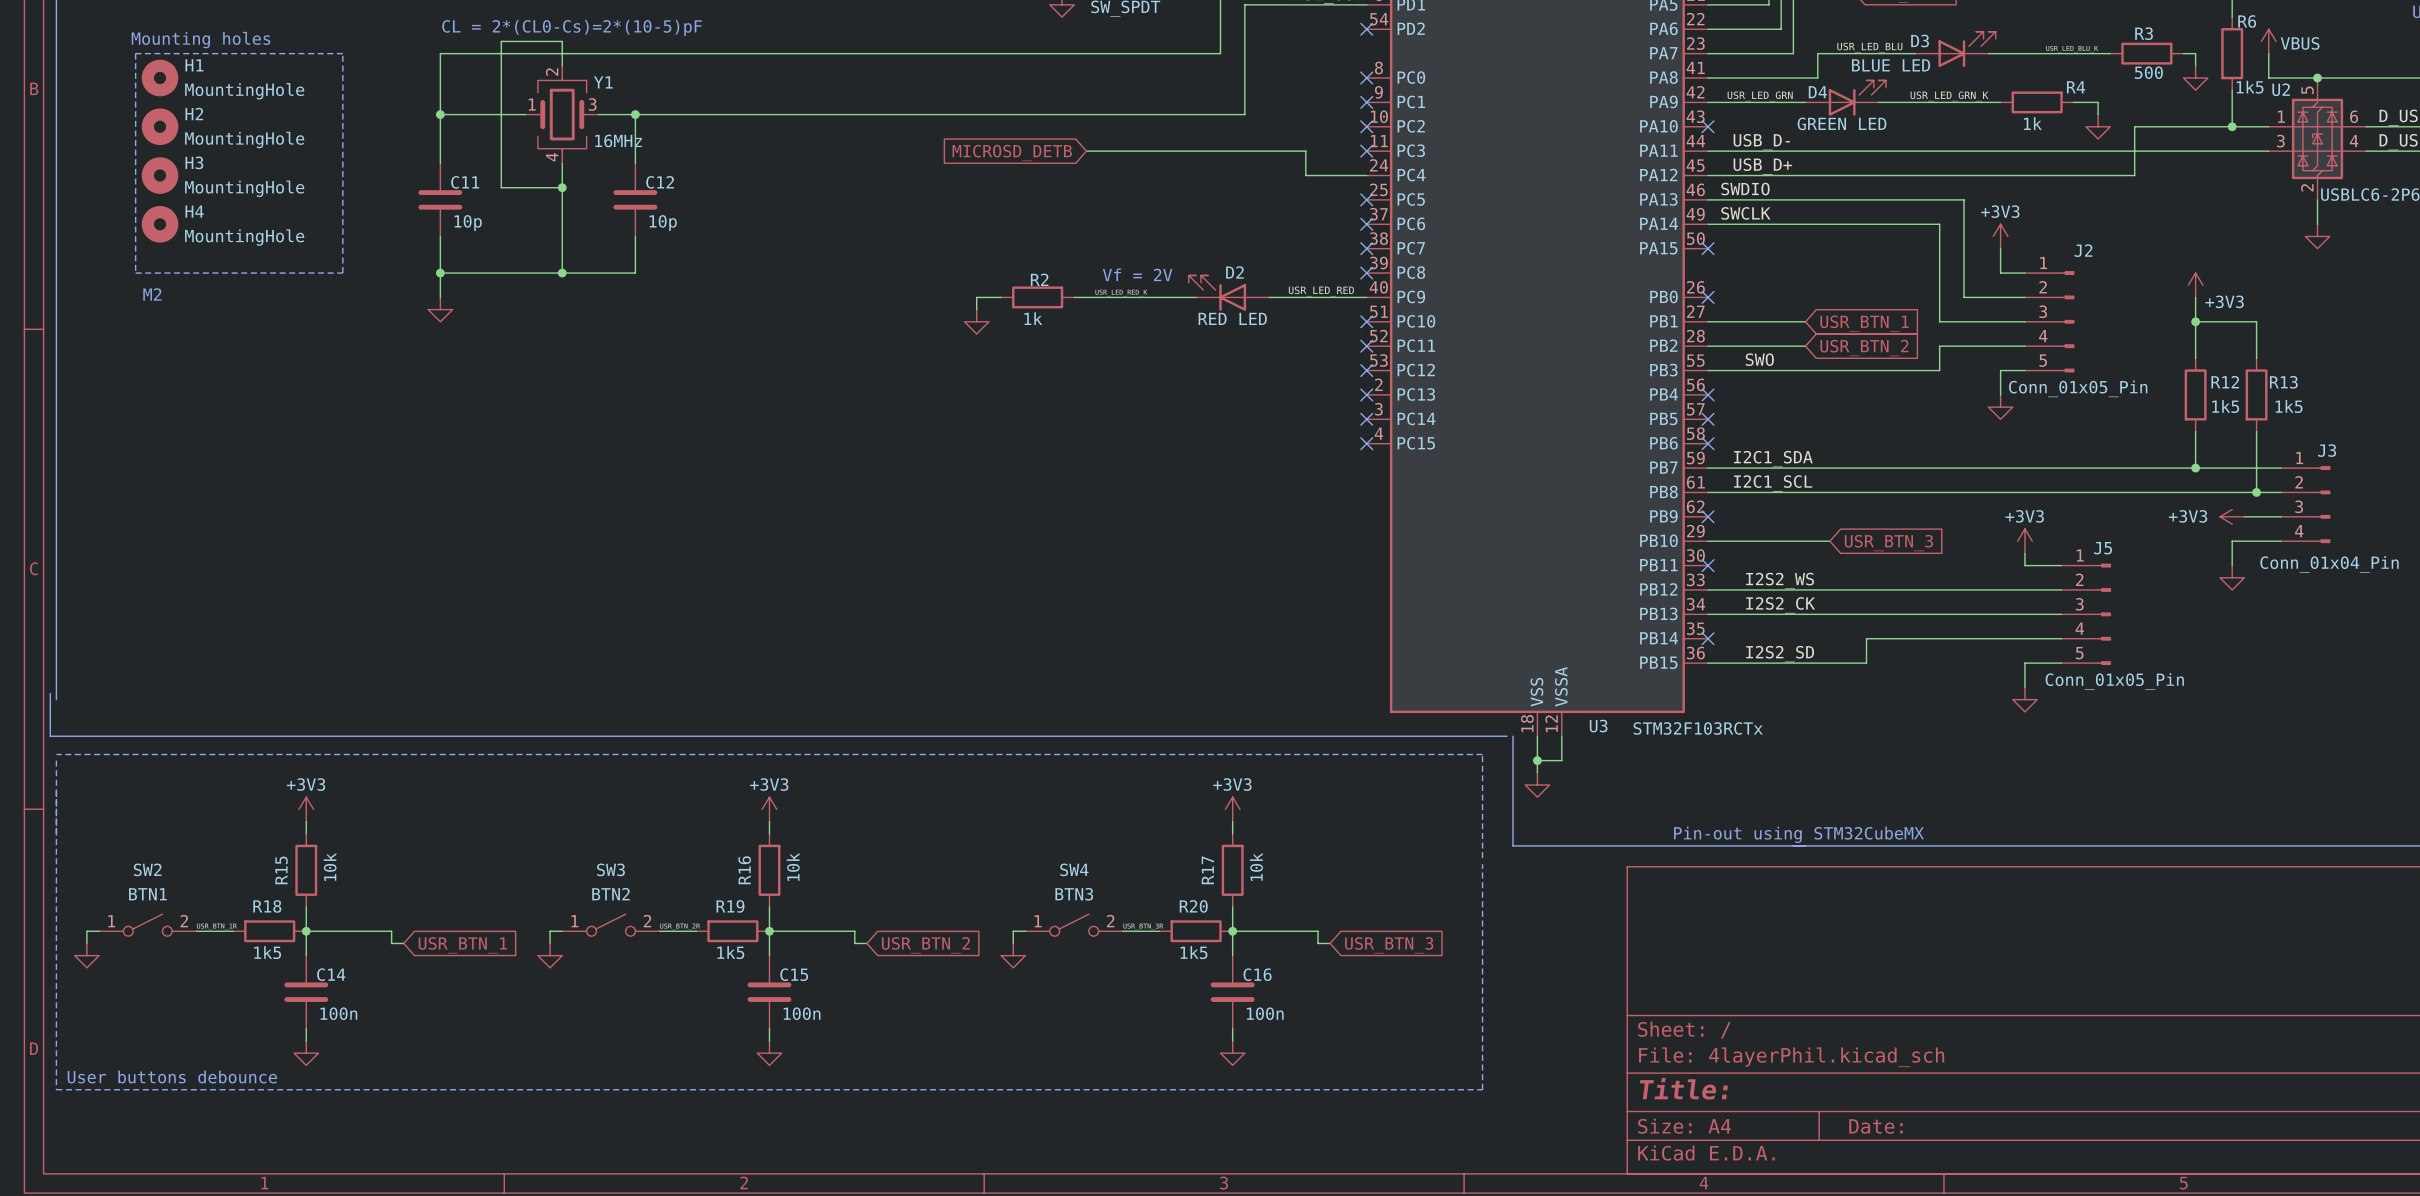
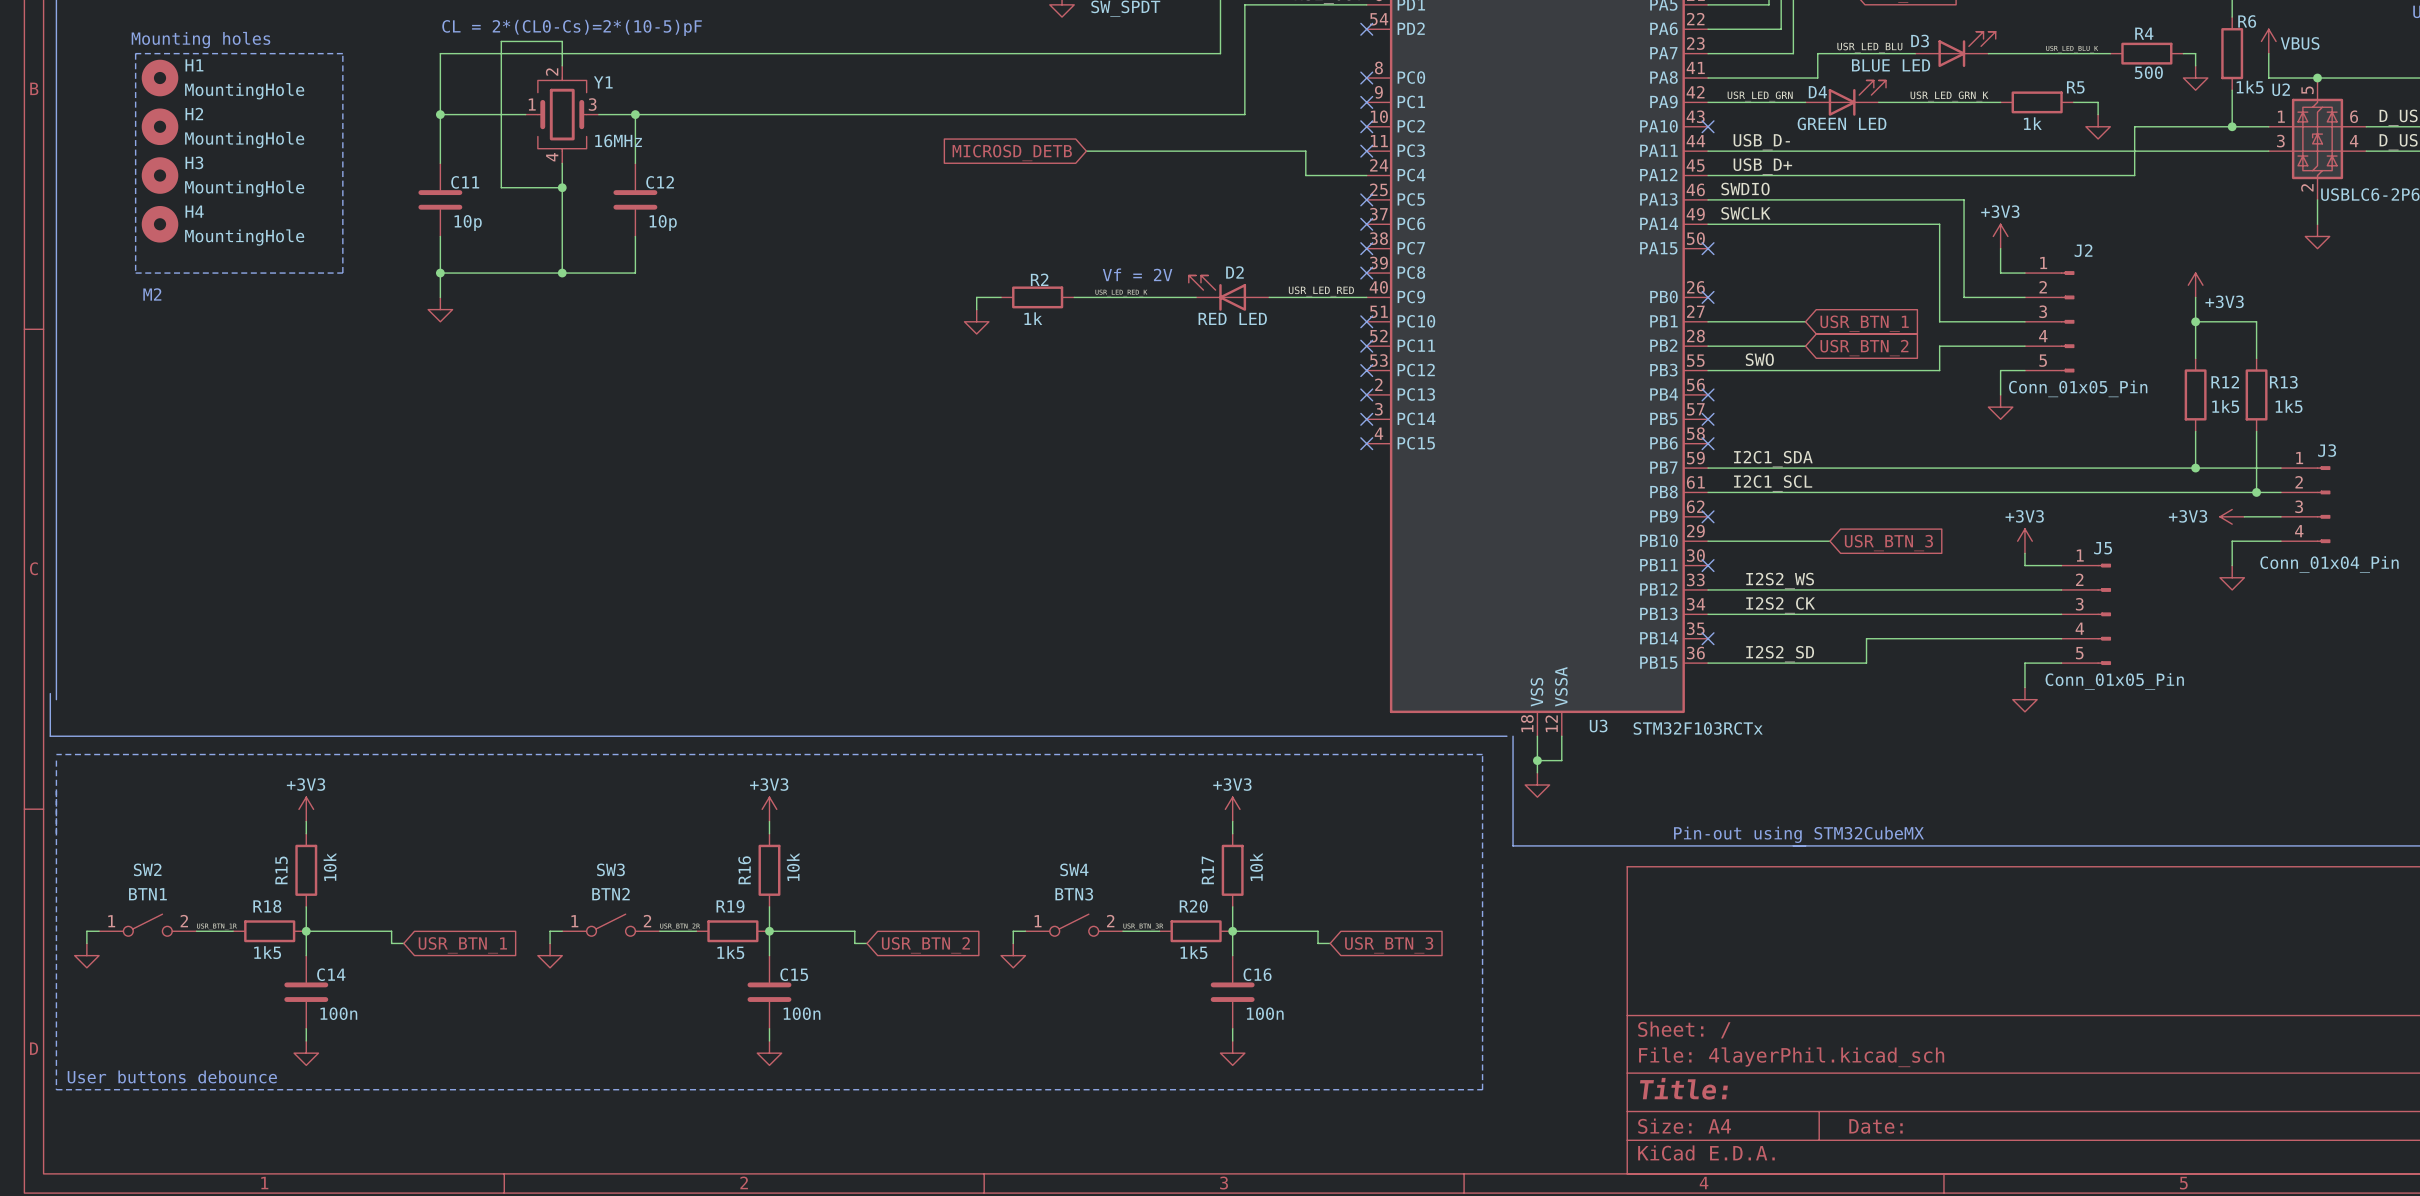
R3 name: R3 (2144, 33) -> R4 (2144, 33)
R4 name: R4 (2076, 87) -> R5 (2075, 87)

